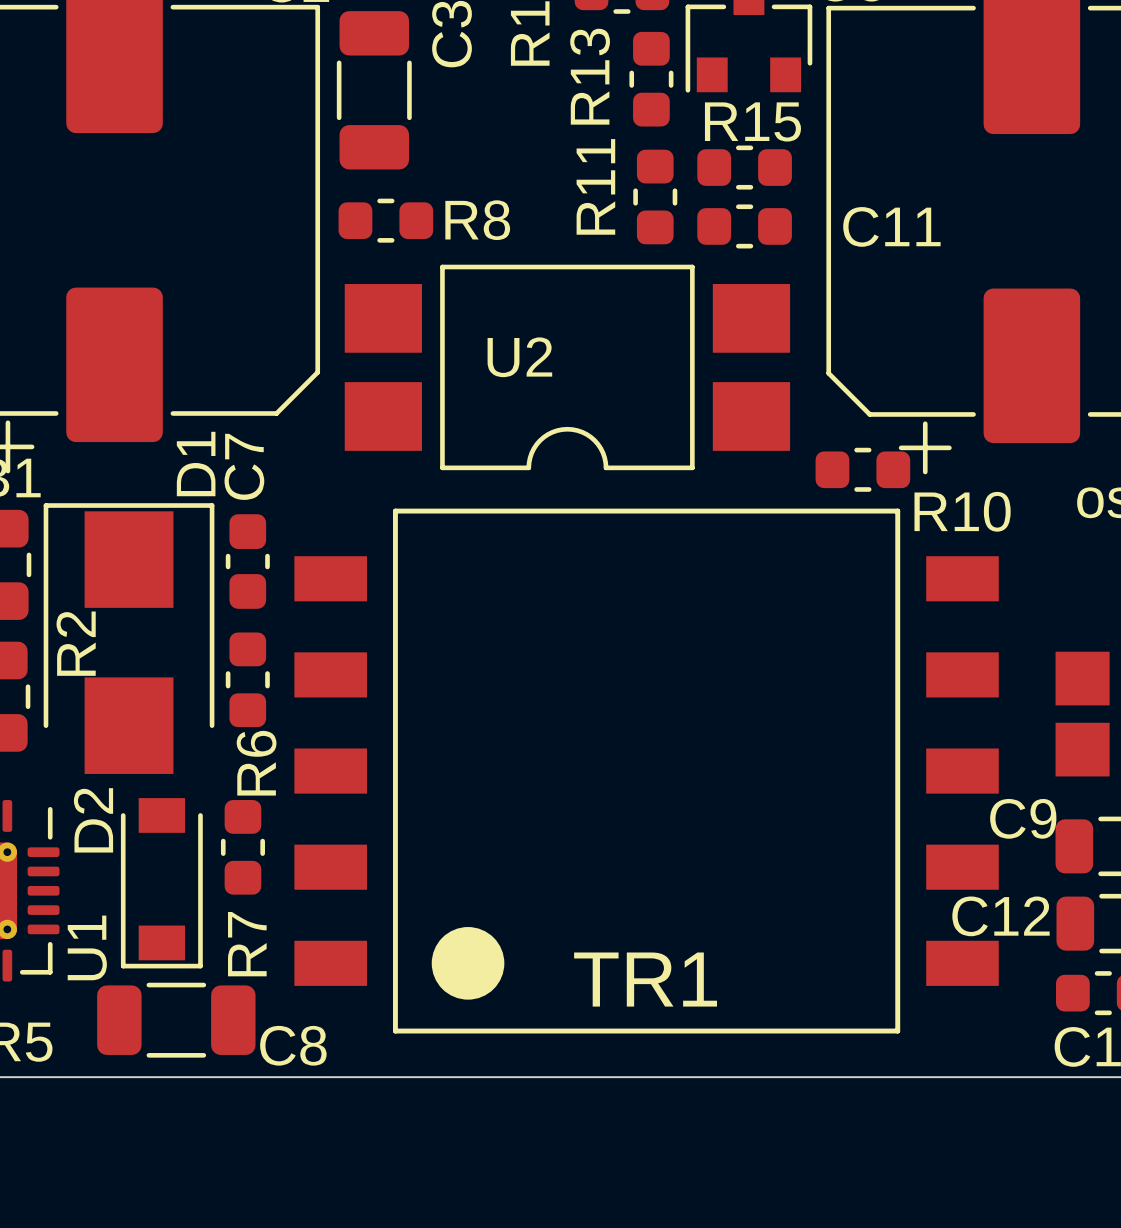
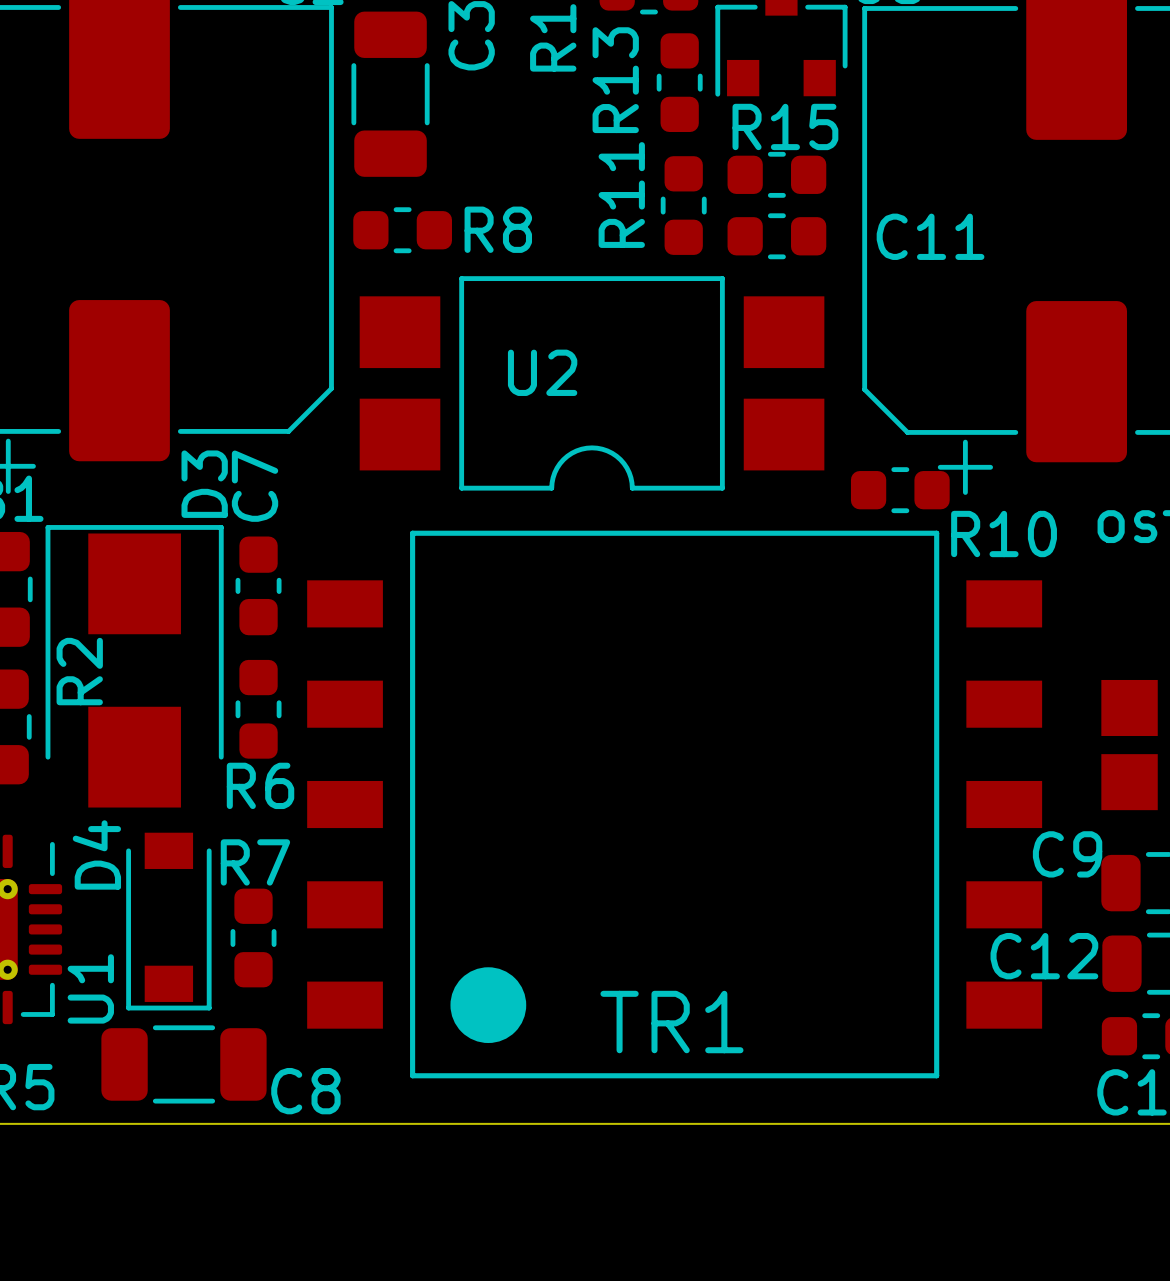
D1 name: D1 (196, 464) -> D3 (204, 484)
R6 name rotation: 0° (256, 763) -> 90° clockwise (260, 785)
D2 name: D2 (93, 820) -> D4 (96, 854)
R7 position: (242, 847) -> (253, 938)
R7 name rotation: 0° (247, 944) -> 90° clockwise (255, 862)
R7 name position: R7 (247, 944) -> R7 (255, 862)

